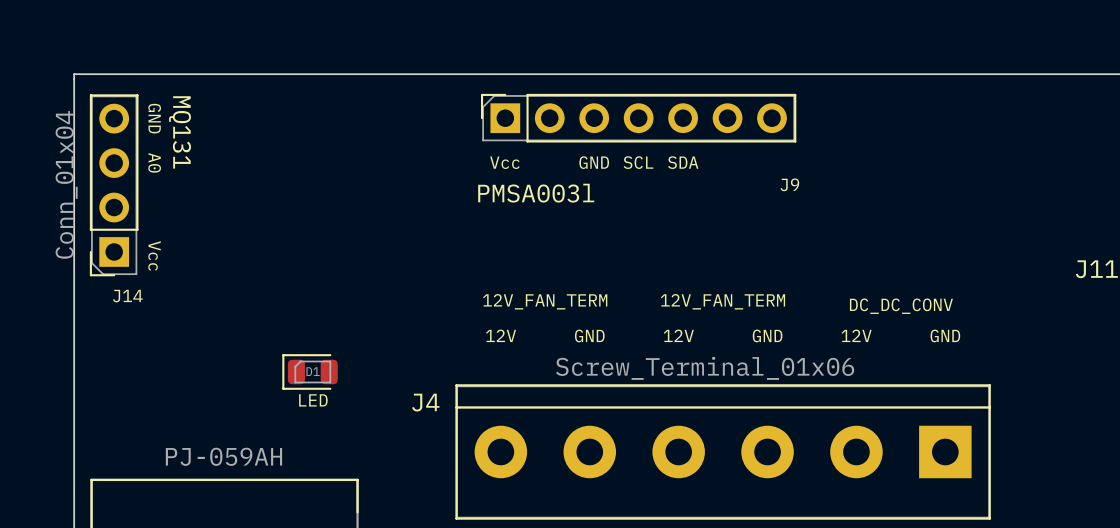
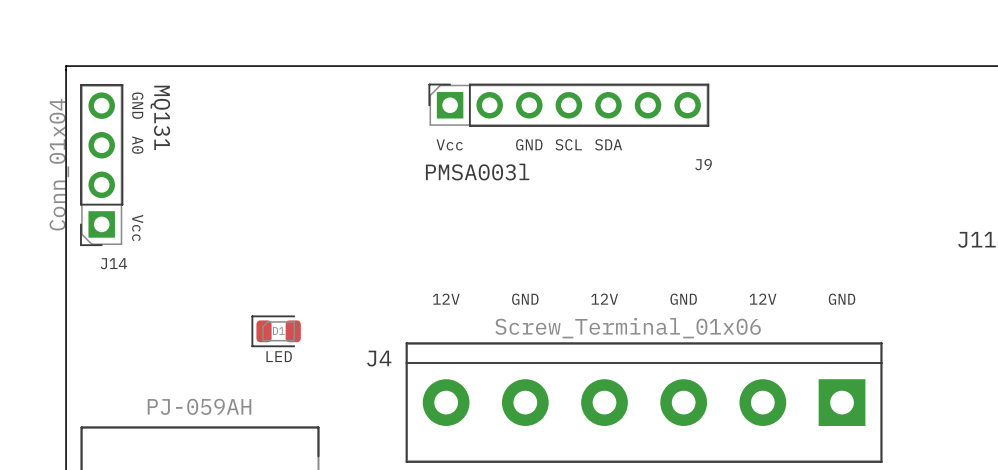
text: 12V_FAN_TERM (545, 301) -> none
text: 12V_FAN_TERM (722, 301) -> none
text: DC_DC_CONV (901, 306) -> none

